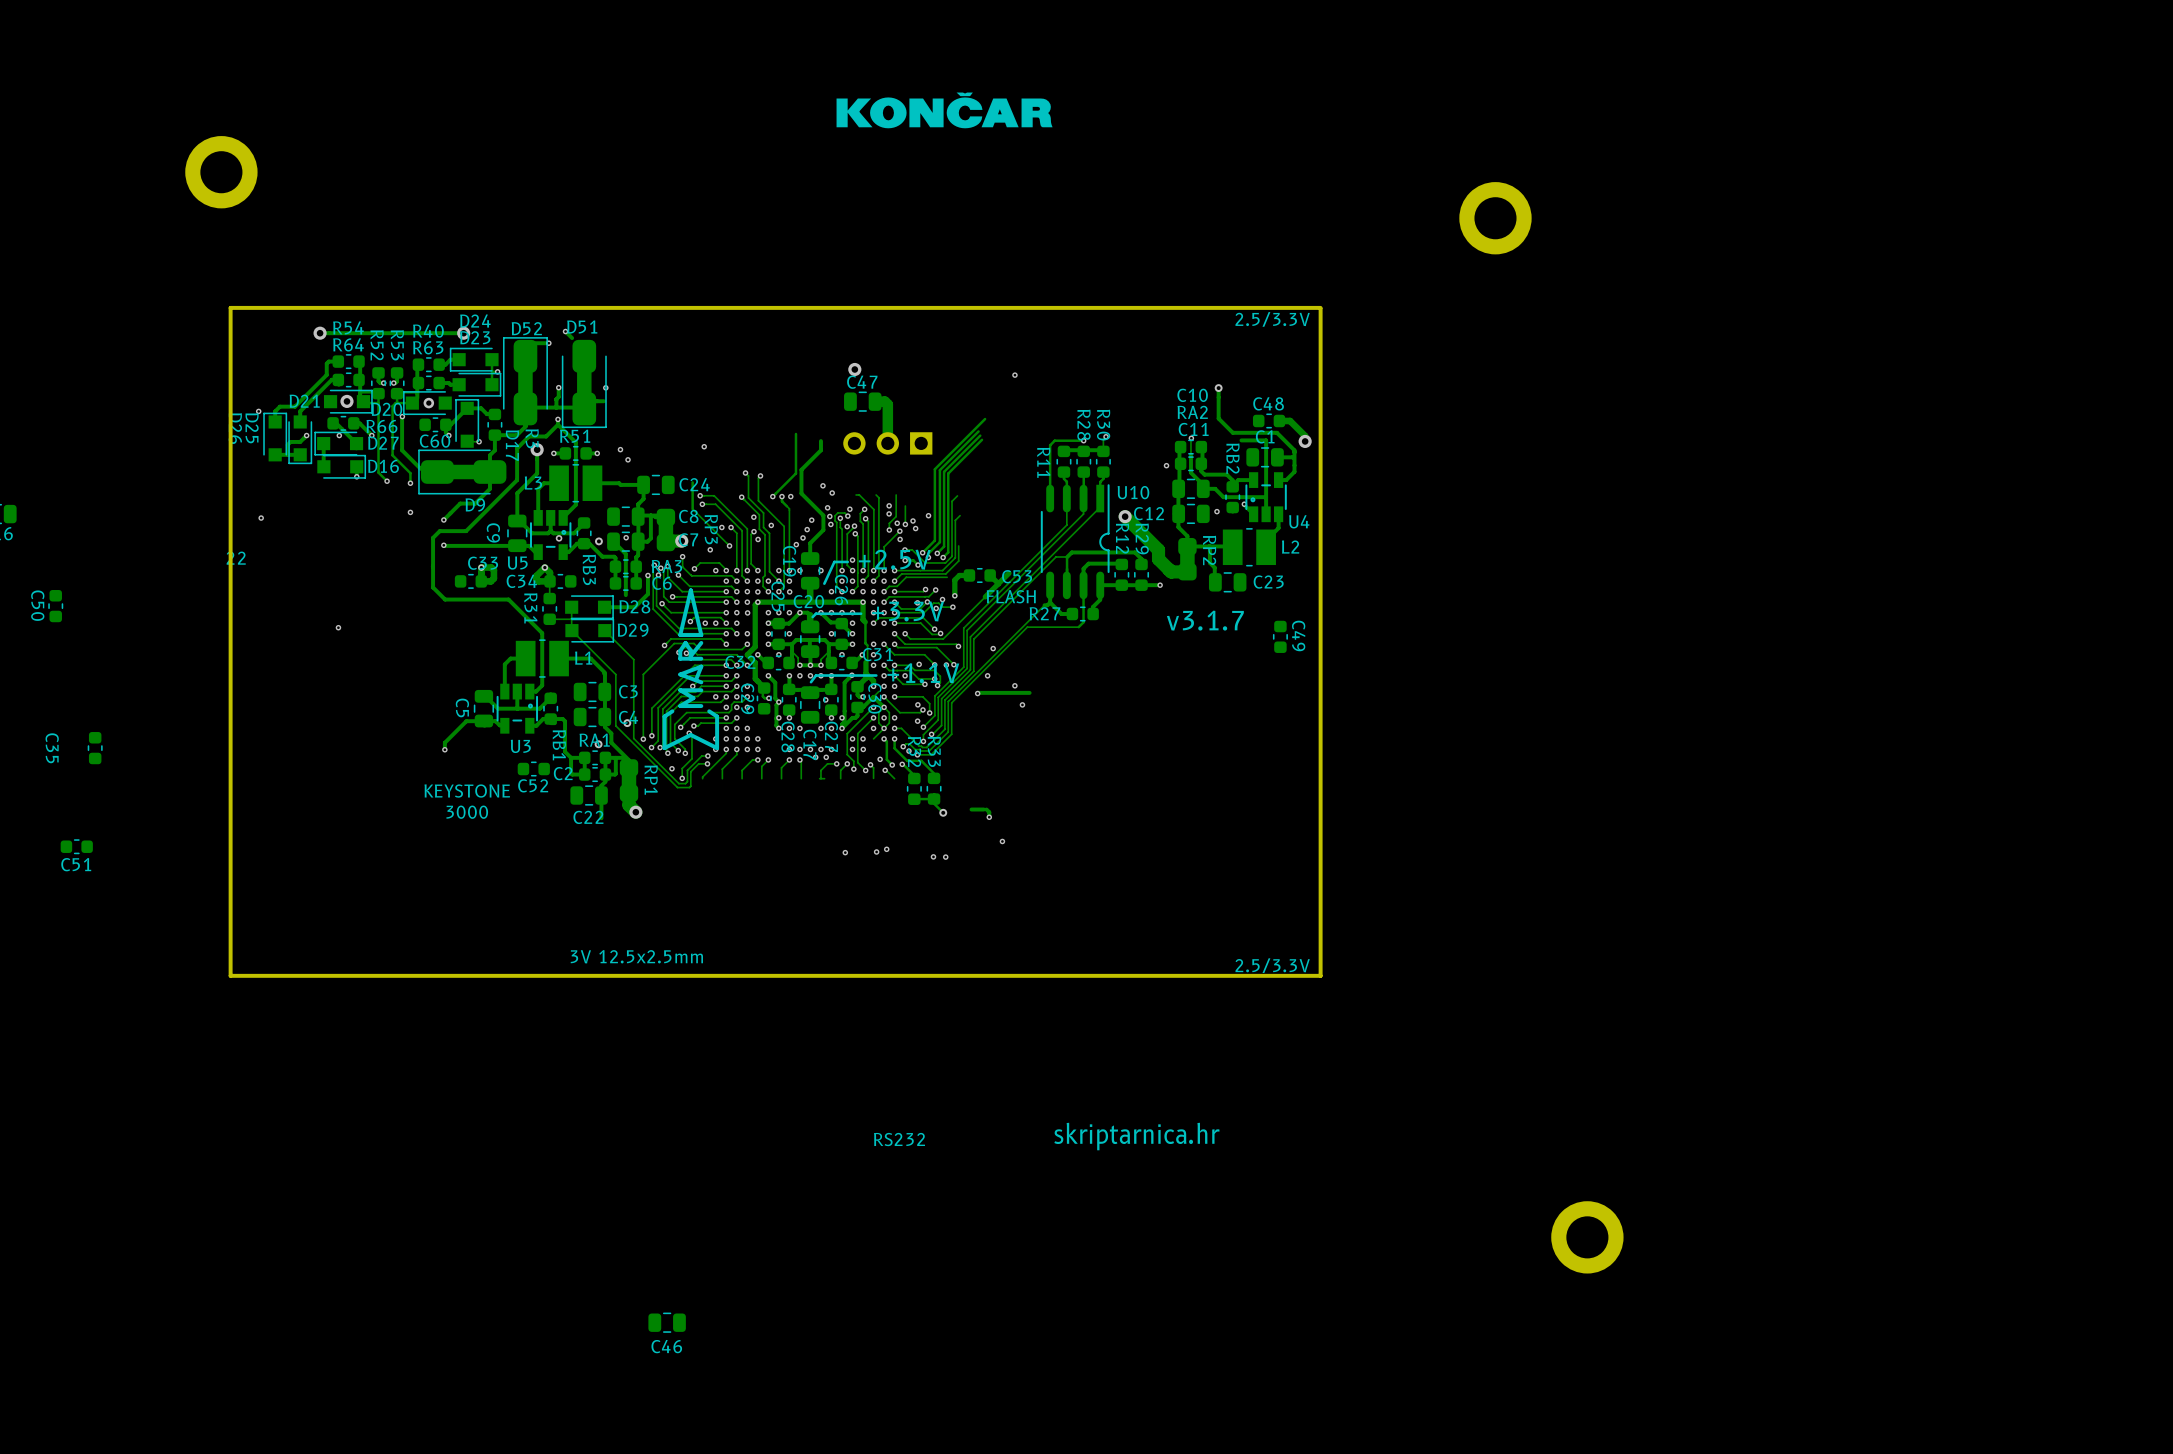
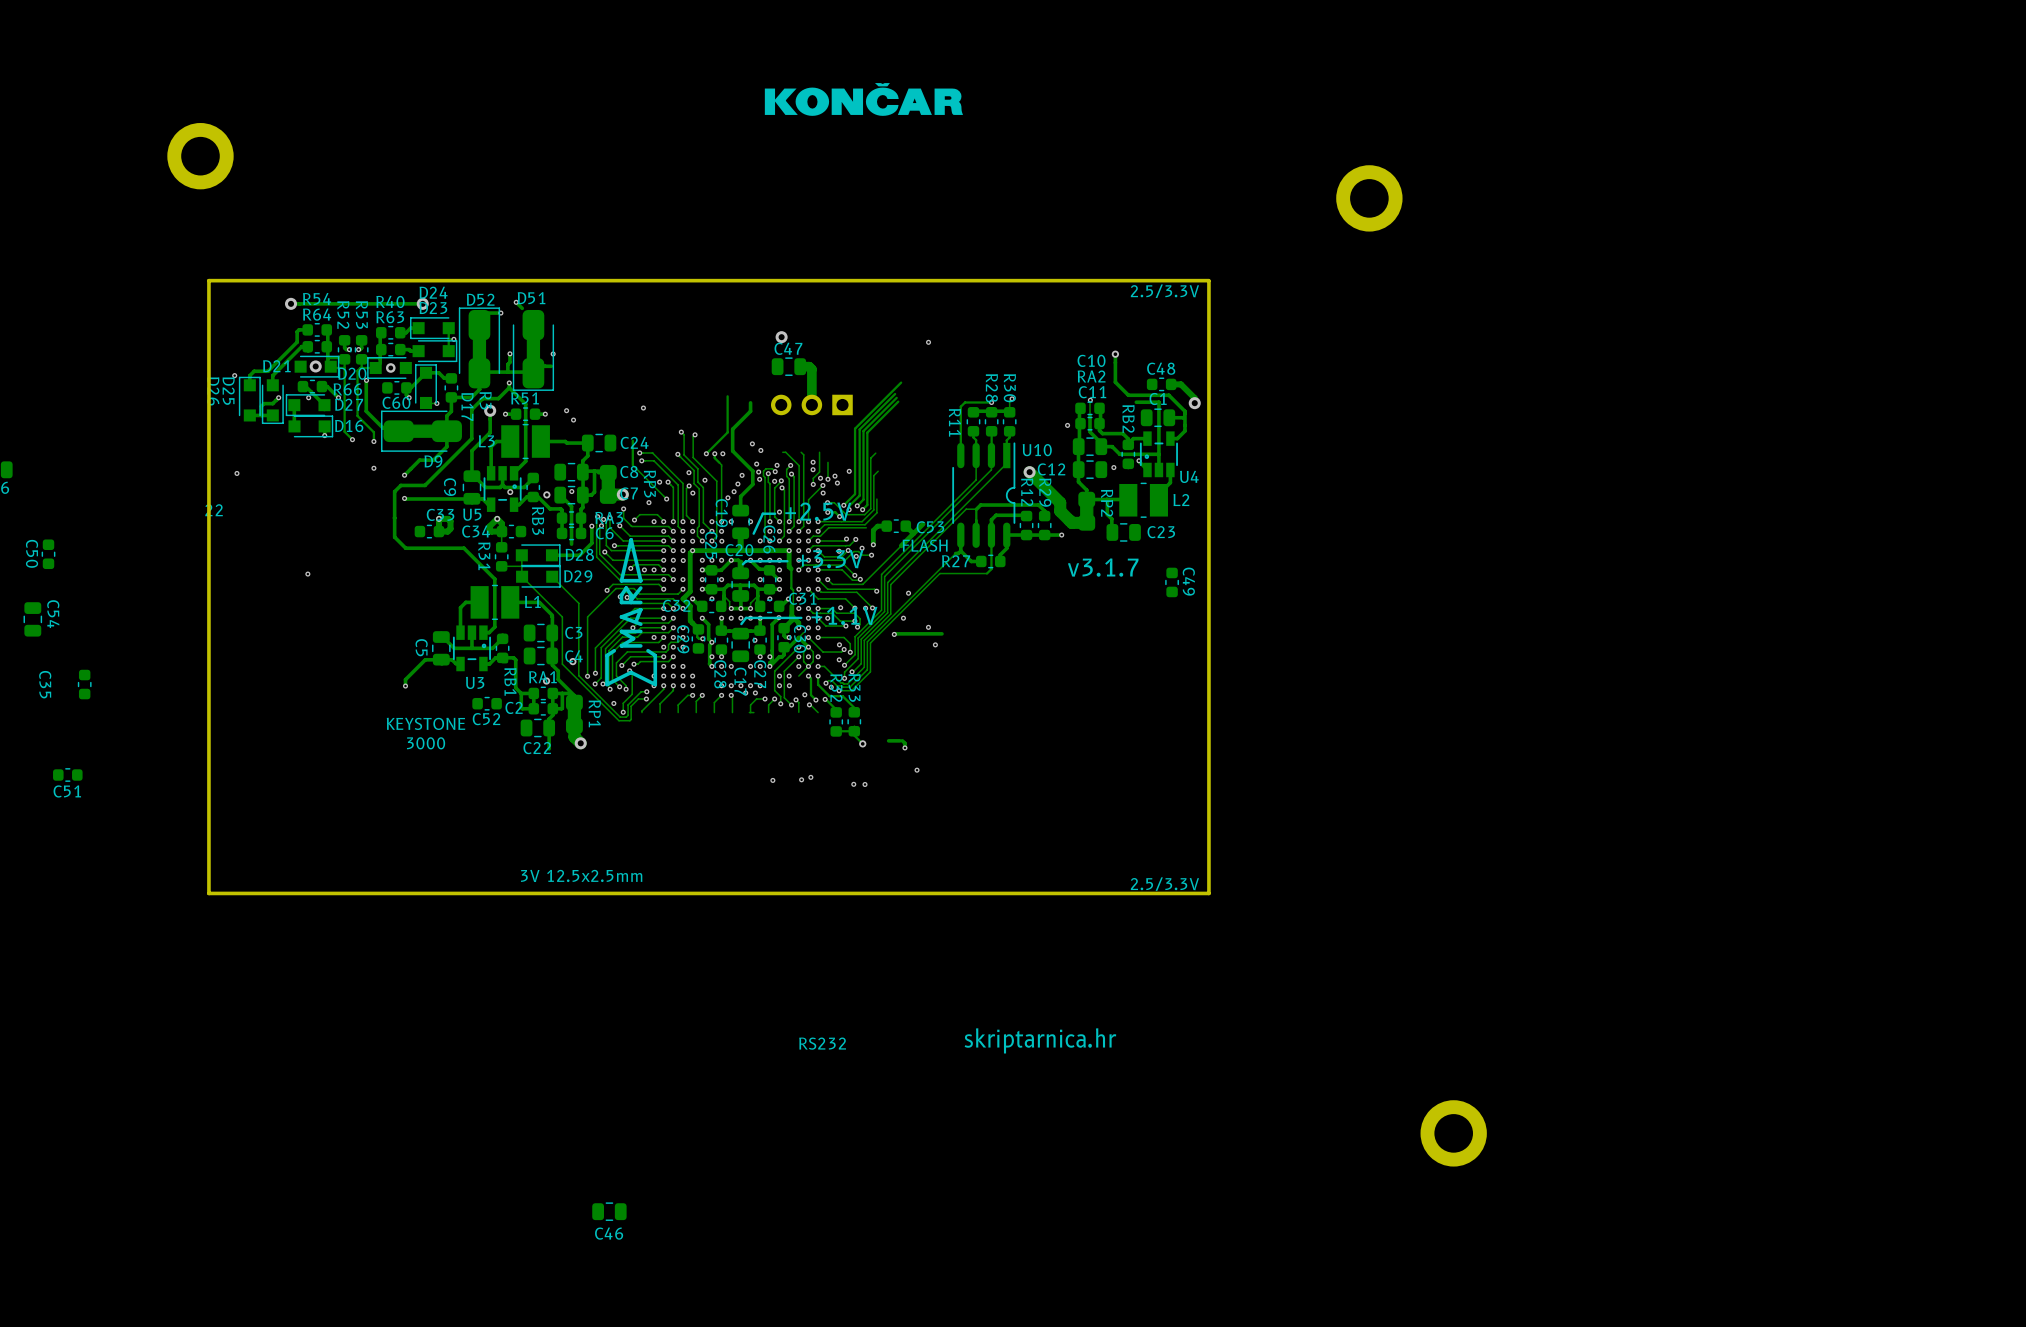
C54: none -> (32, 619)

